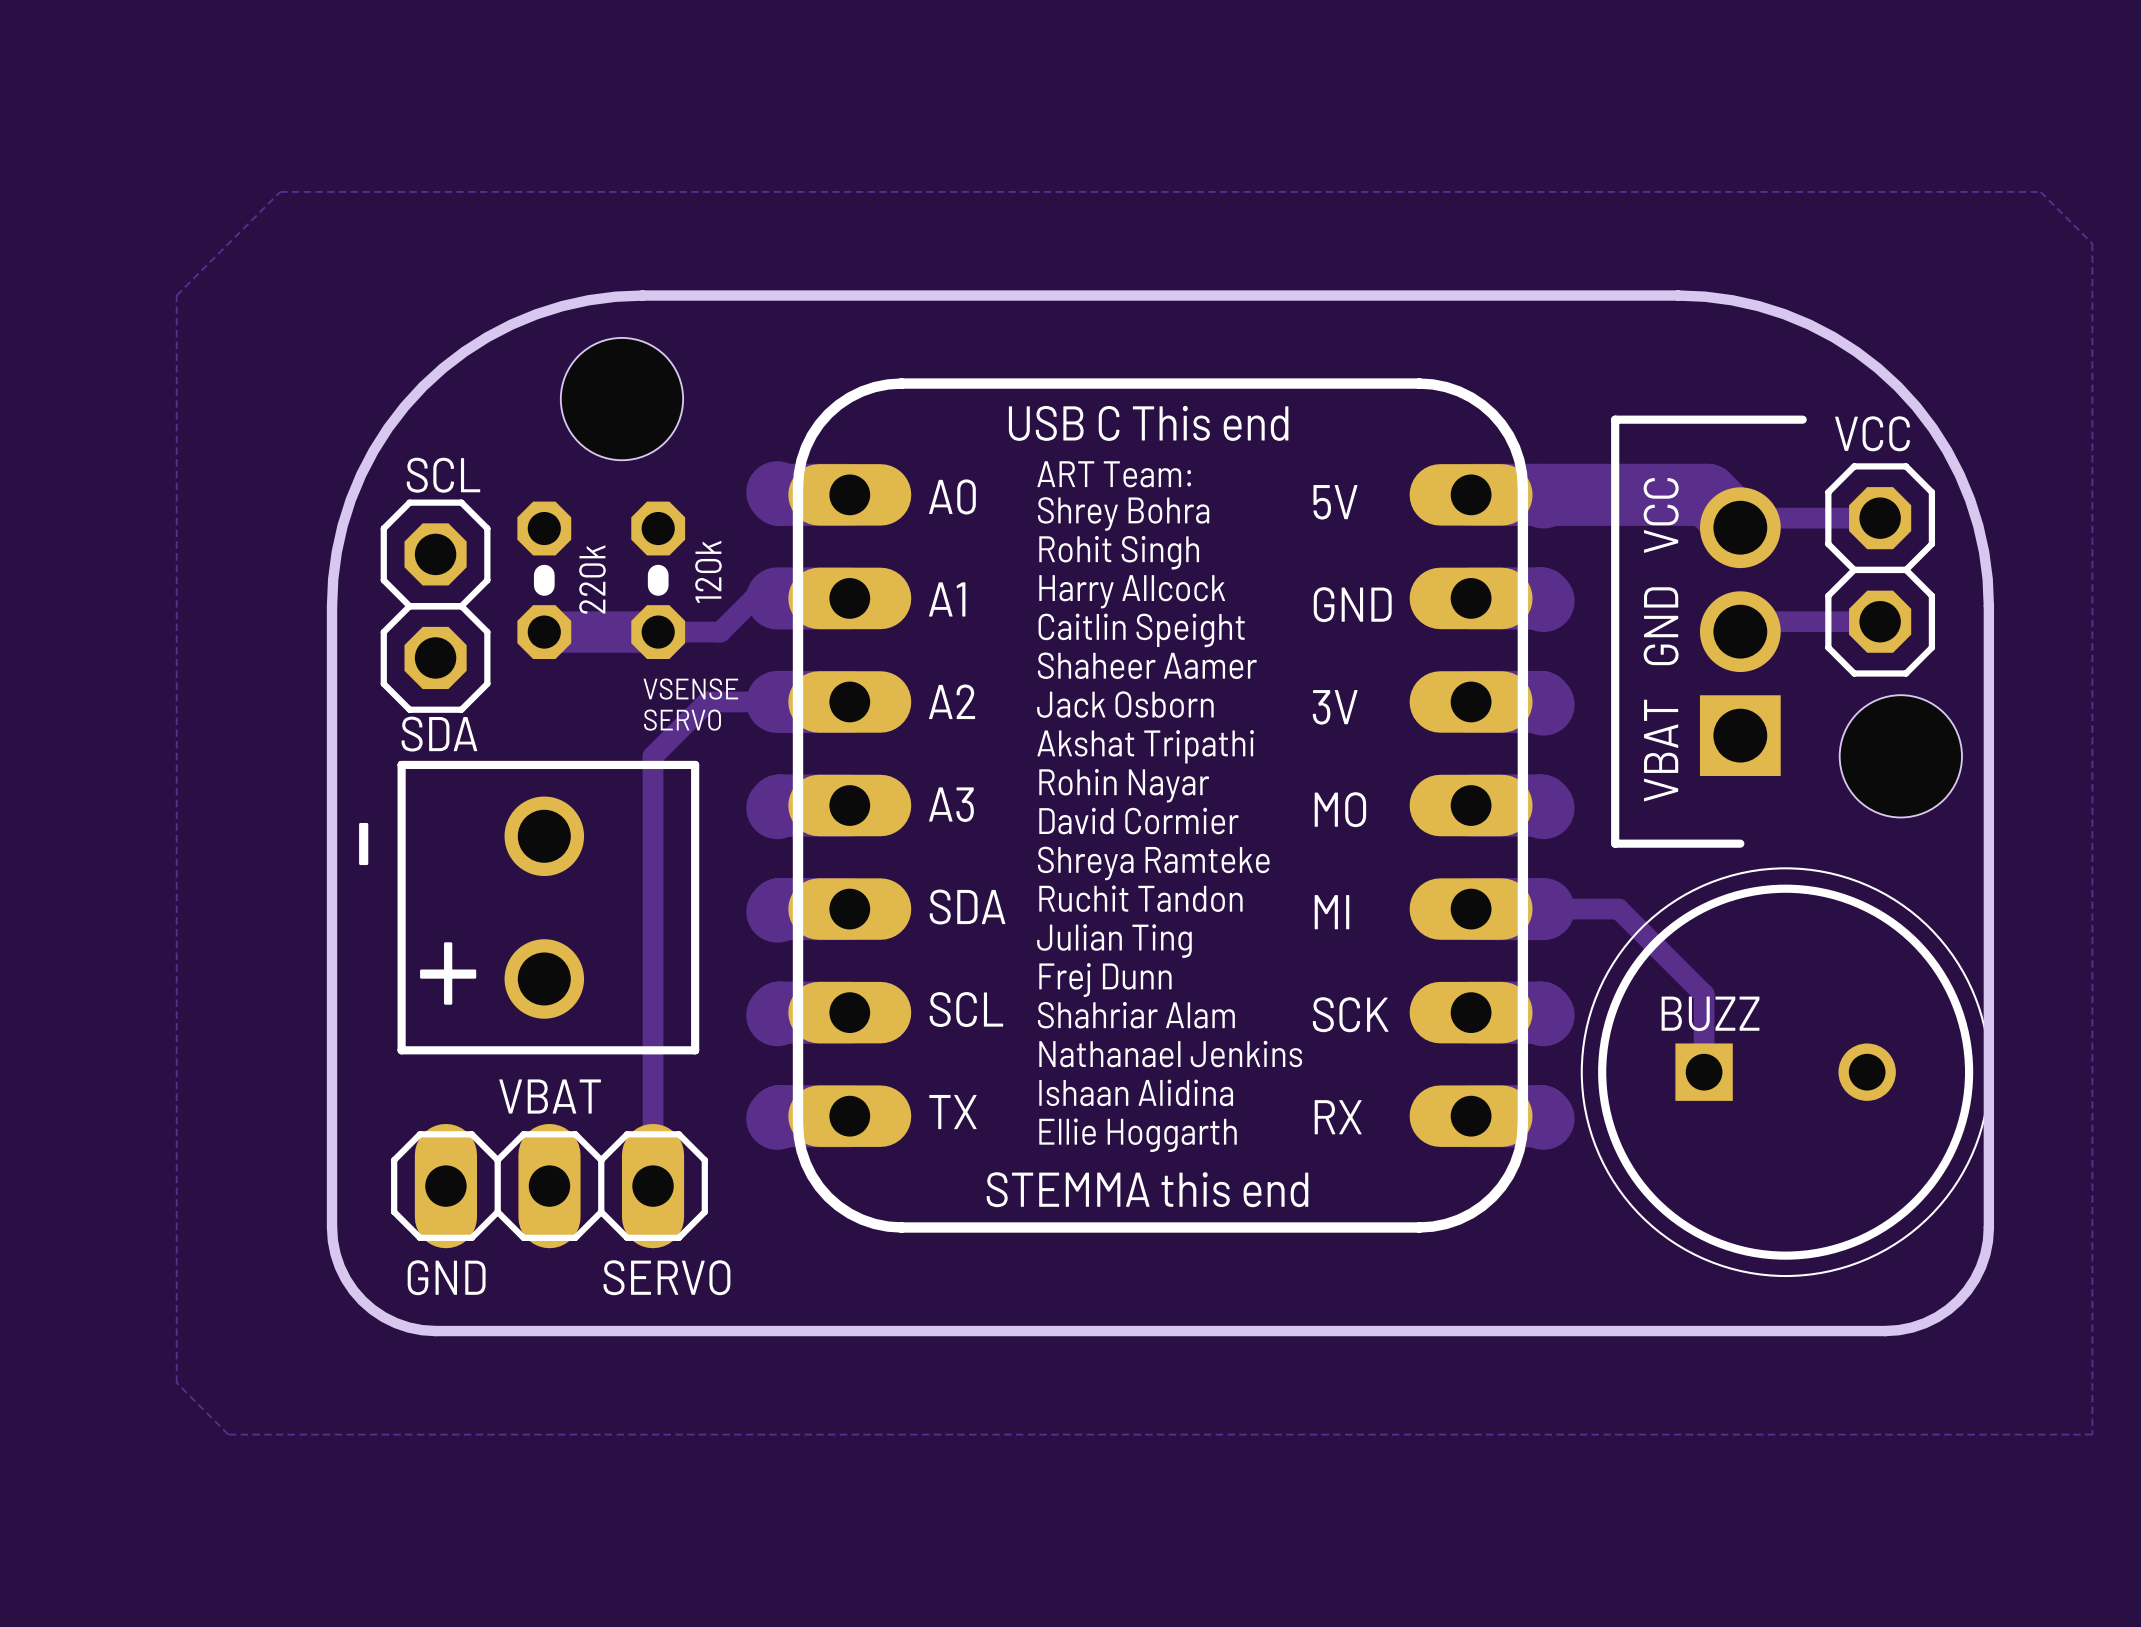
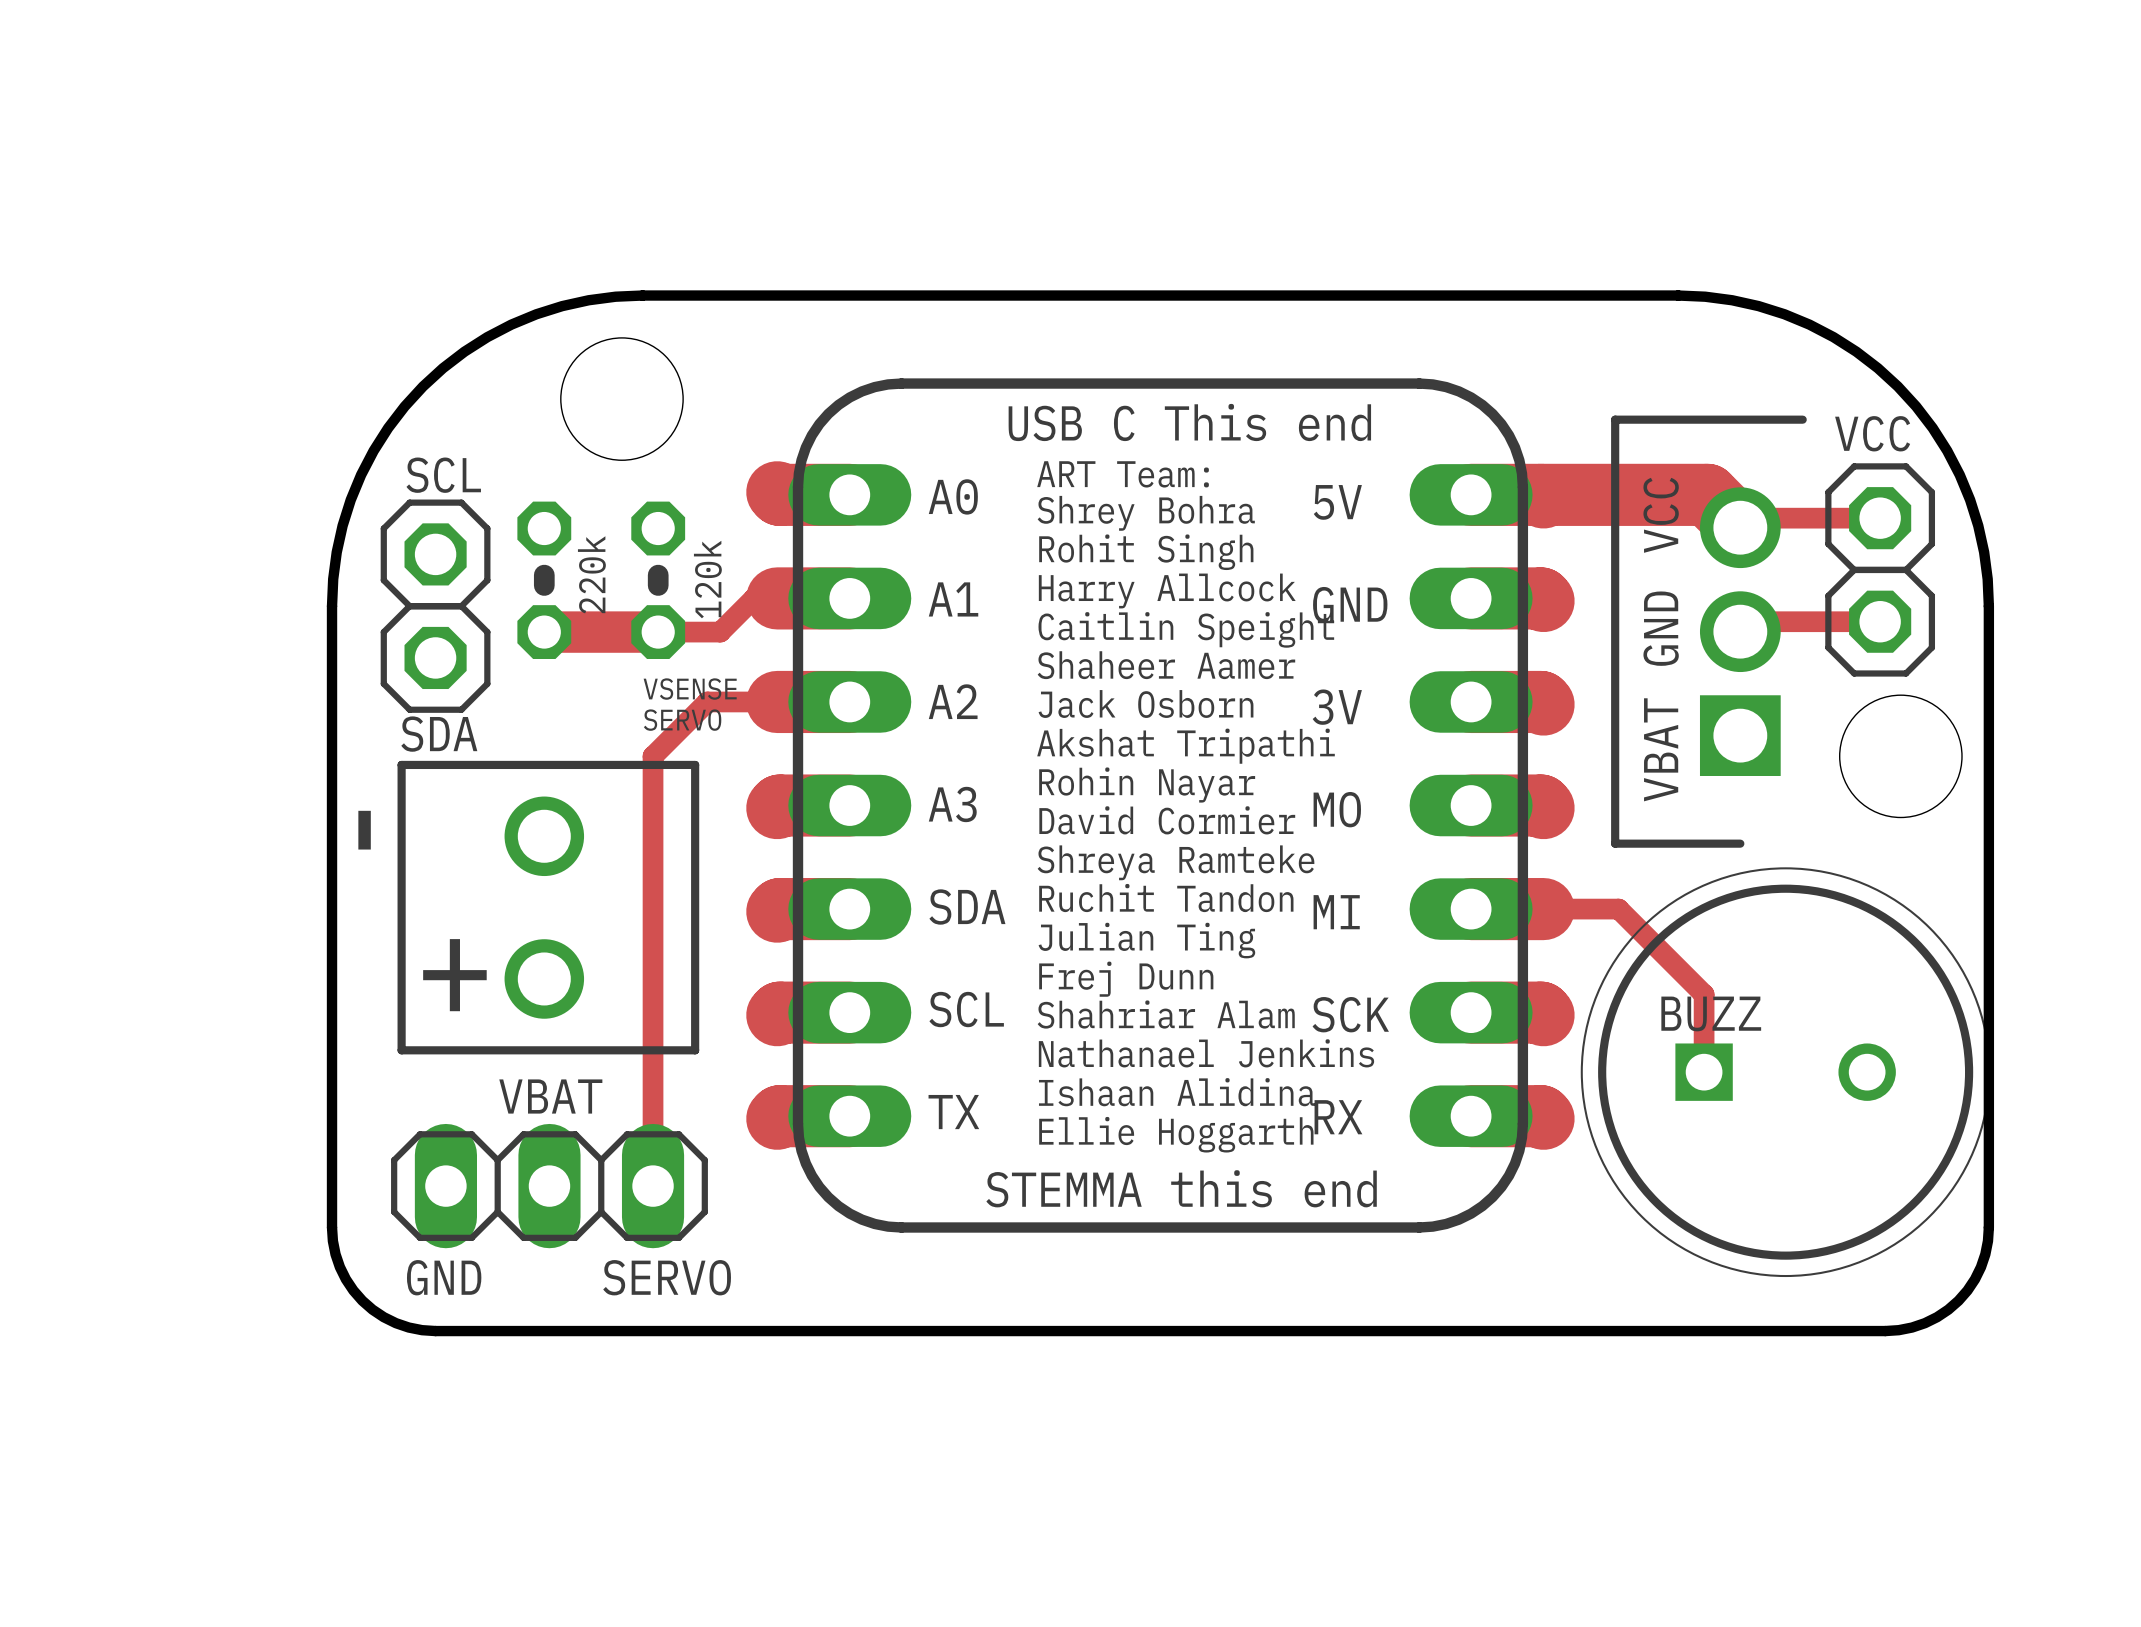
zone outline: (280, 191) (2040, 191) (2092, 243) (2092, 1434) (228, 1434) (176, 1382) (176, 295) (280, 191) -> none

